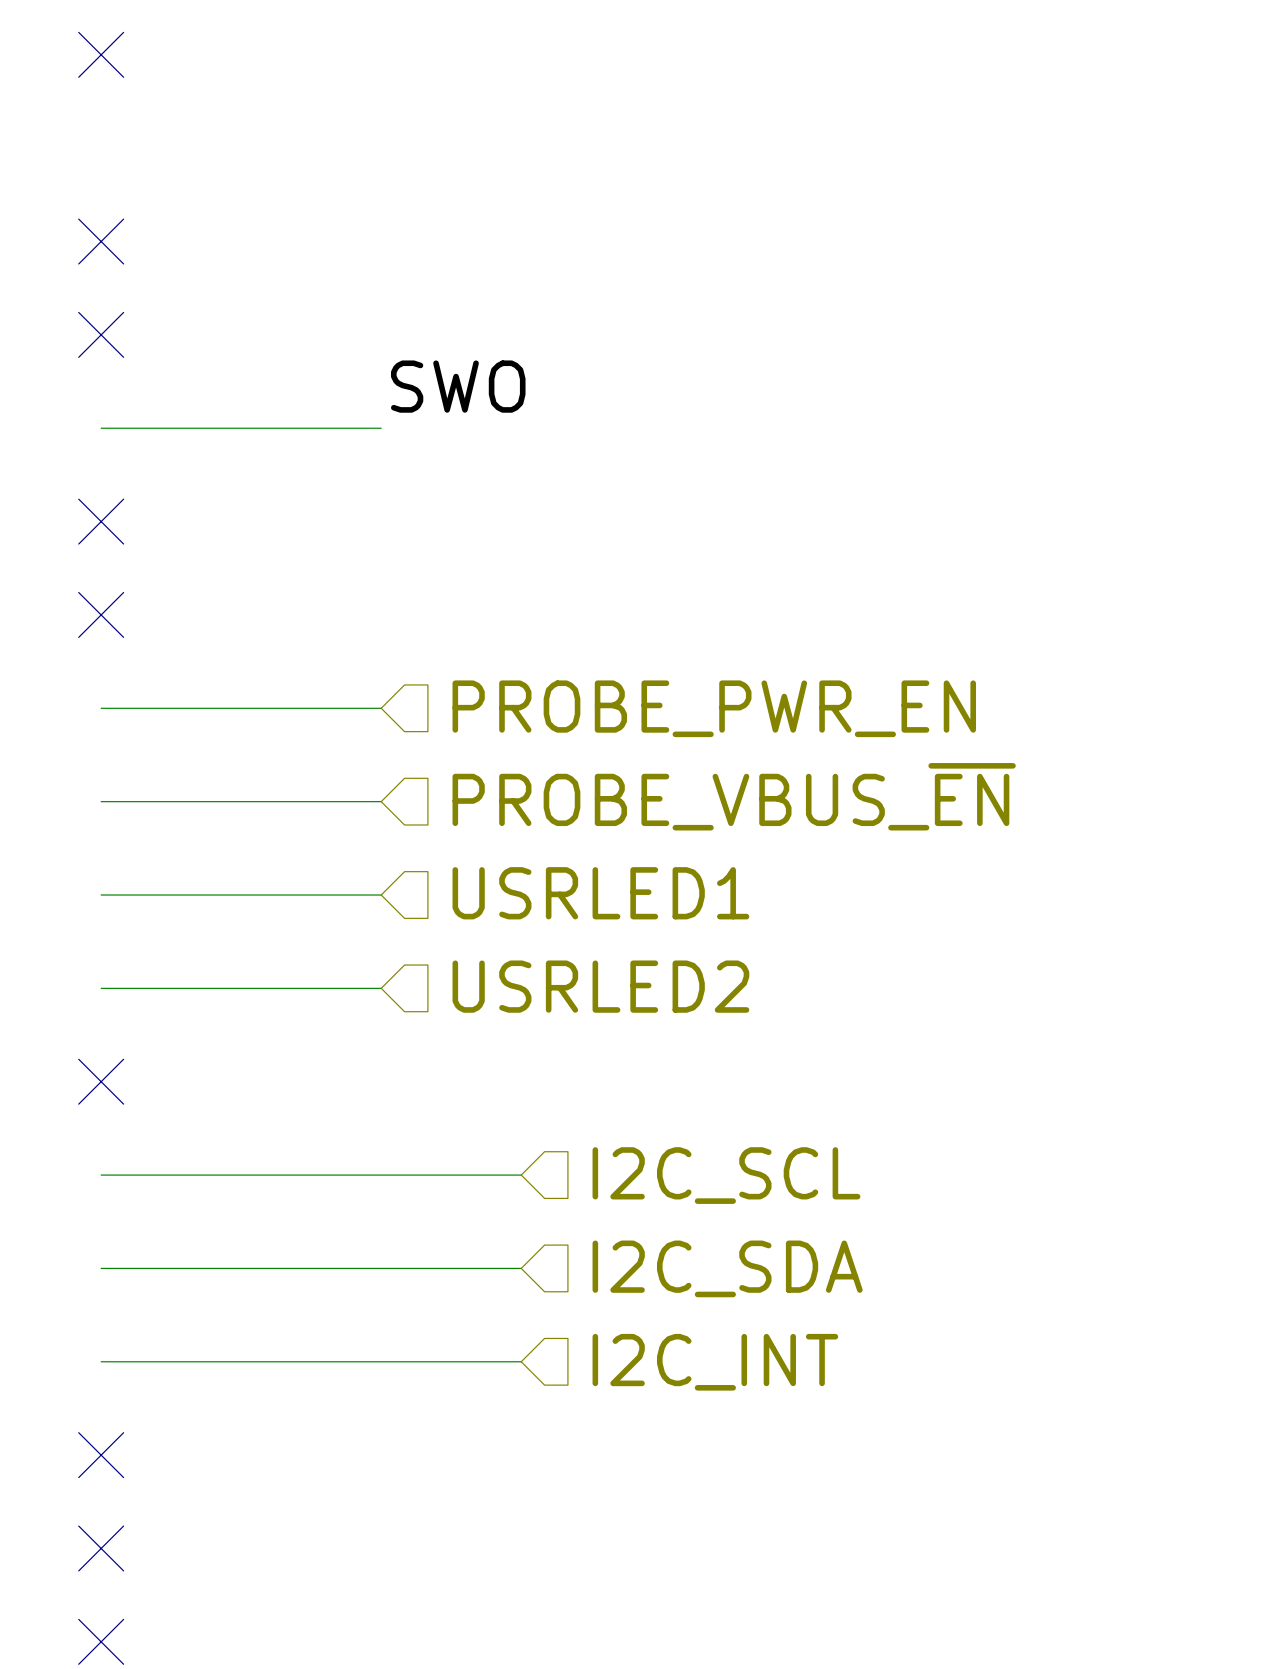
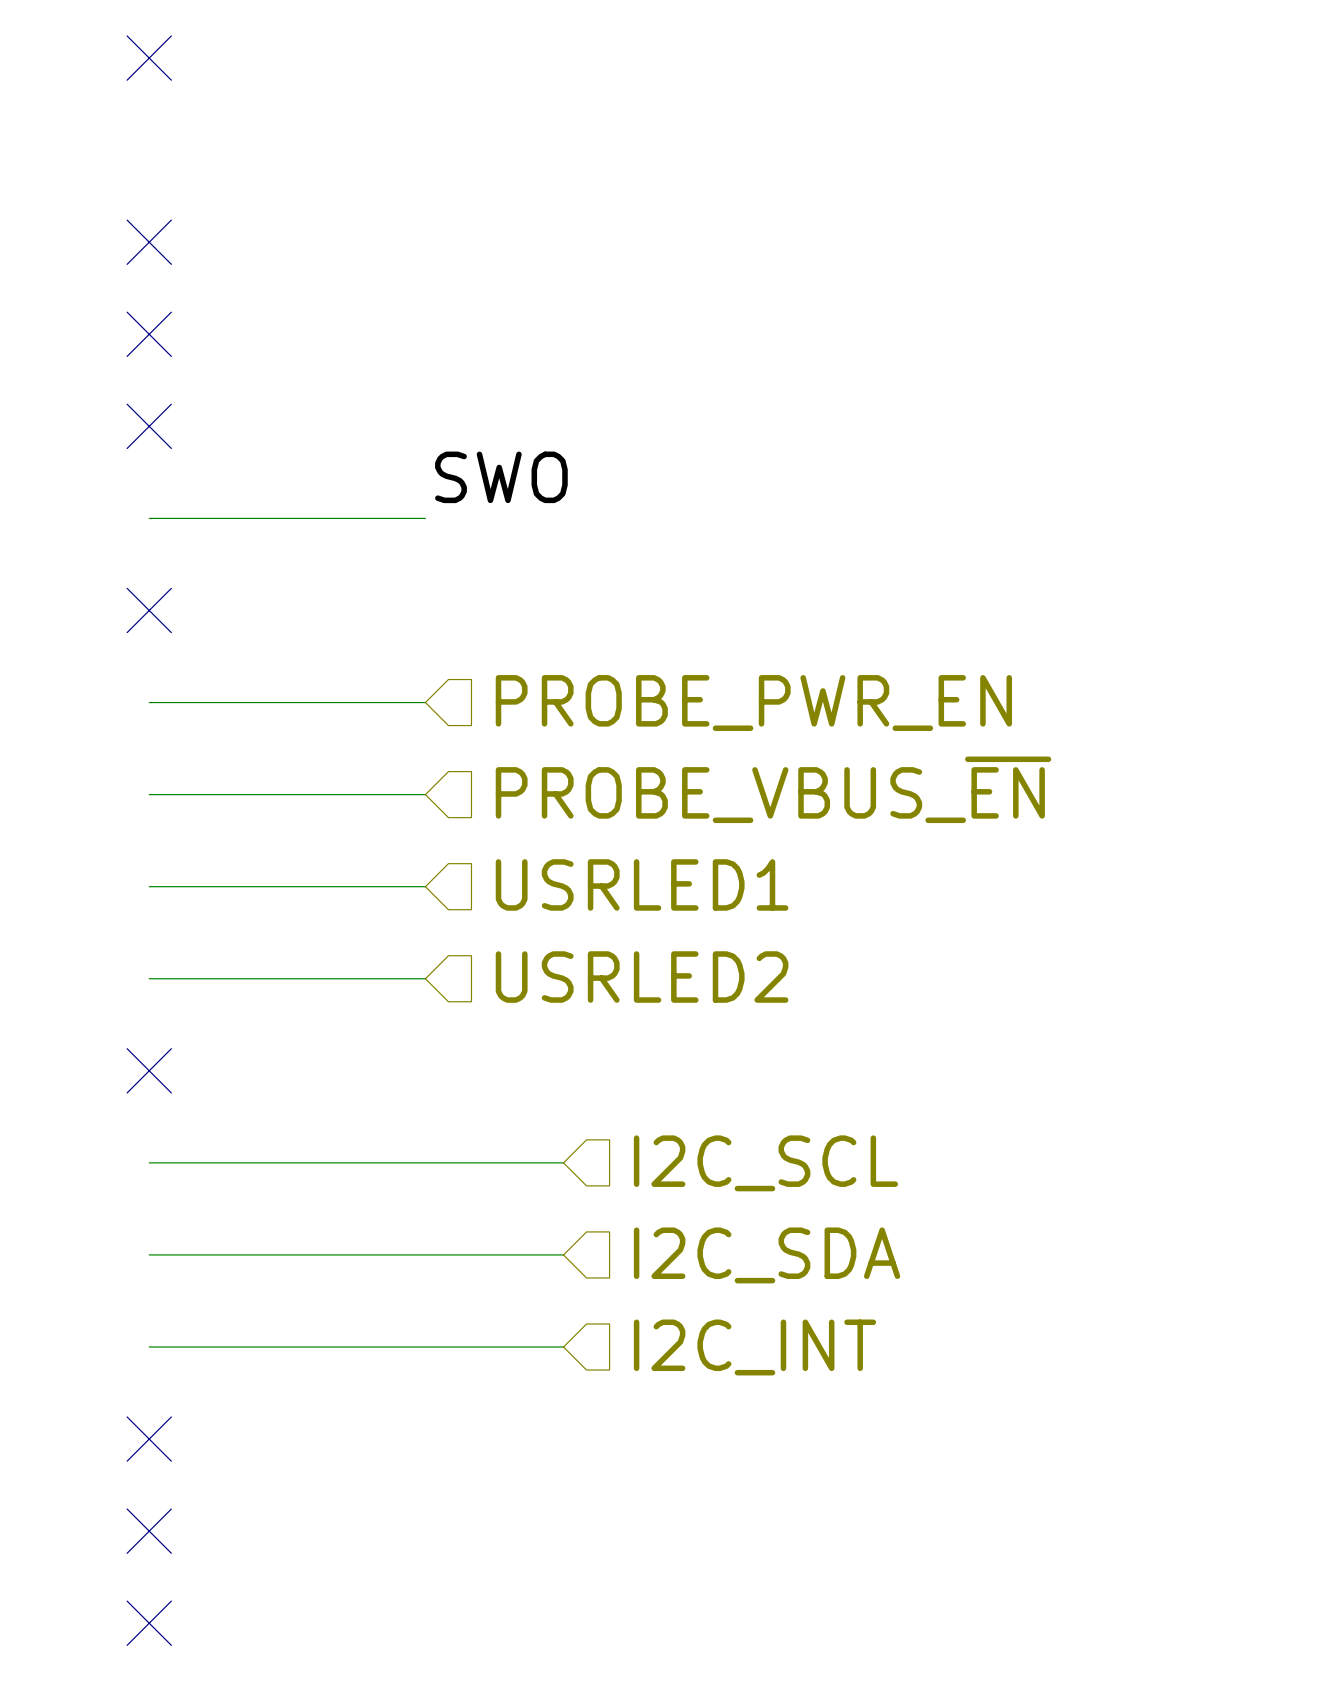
label position: SWO (458, 386) -> SWO (501, 477)
wire: (101, 428) (381, 428) -> (149, 518) (425, 518)
no-connect mark position: (101, 521) -> (149, 426)

